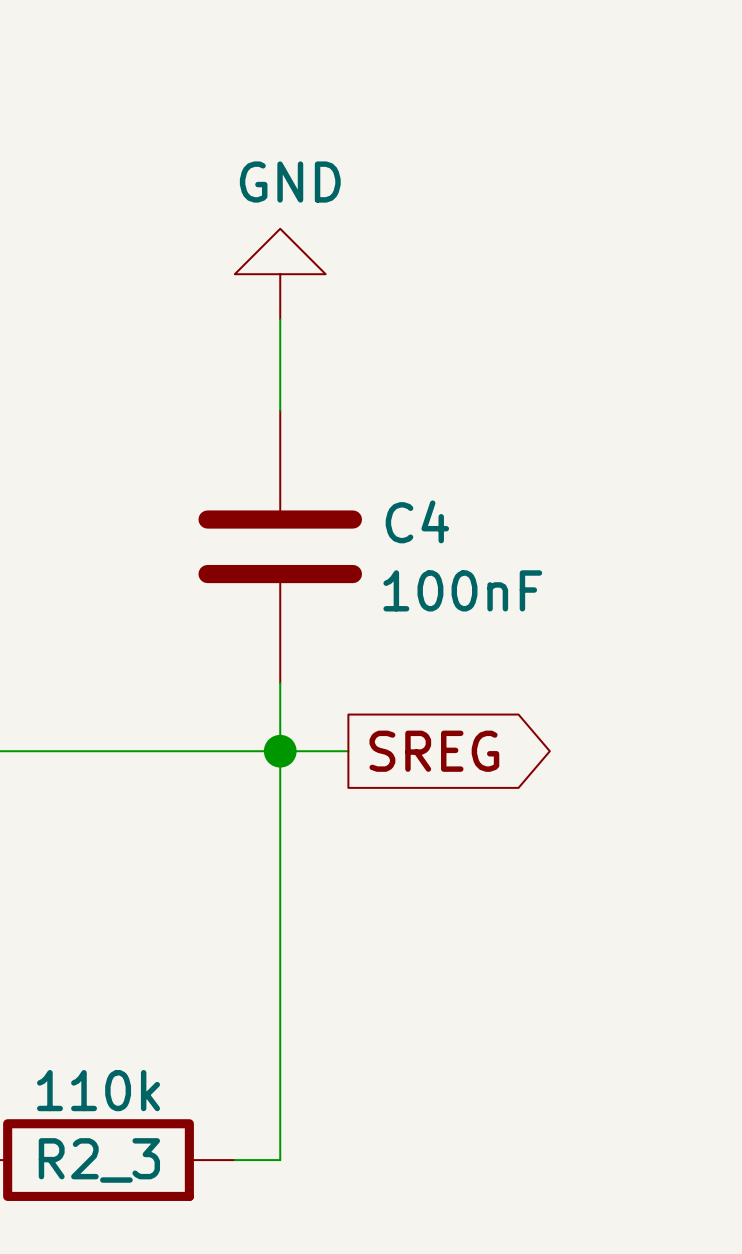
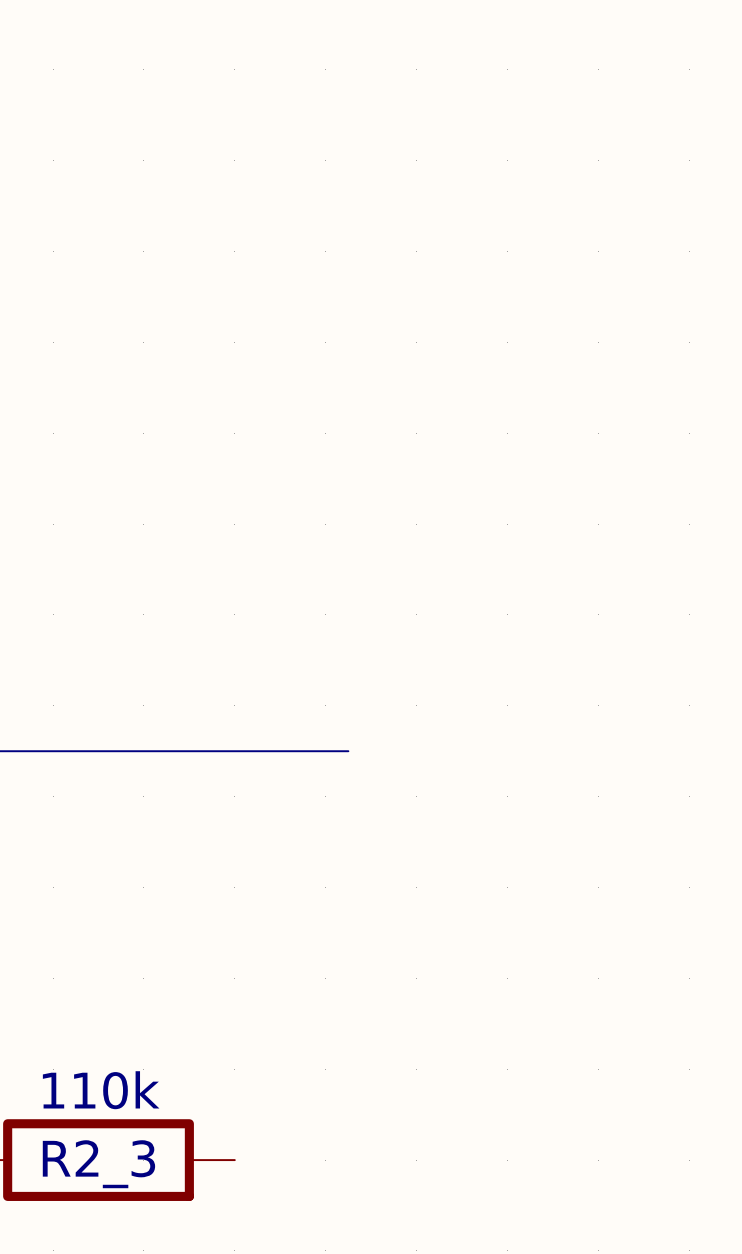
power symbol: GND (280, 274) -> none
wire: (280, 319) (280, 410) -> none
C4: 100nF (280, 546) -> none
wire: (280, 683) (280, 1160) (234, 1160) -> none
junction: (280, 751) -> none
global label: SREG (434, 751) -> none

